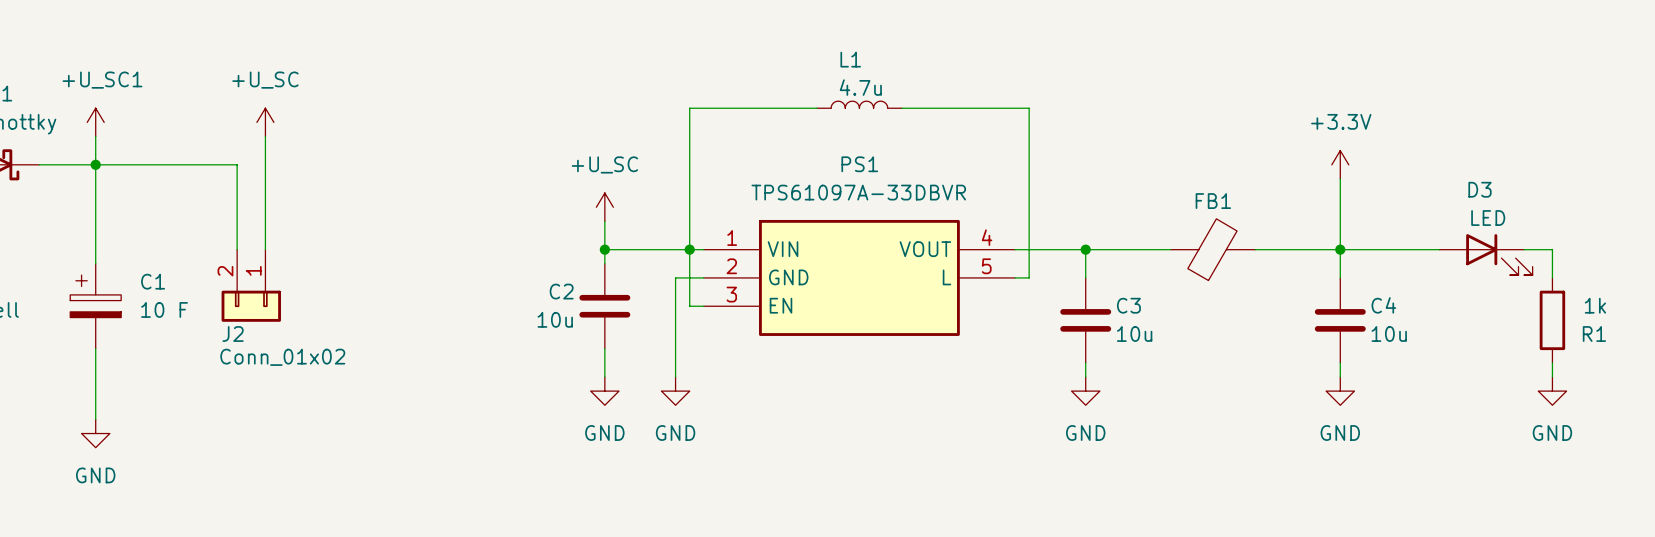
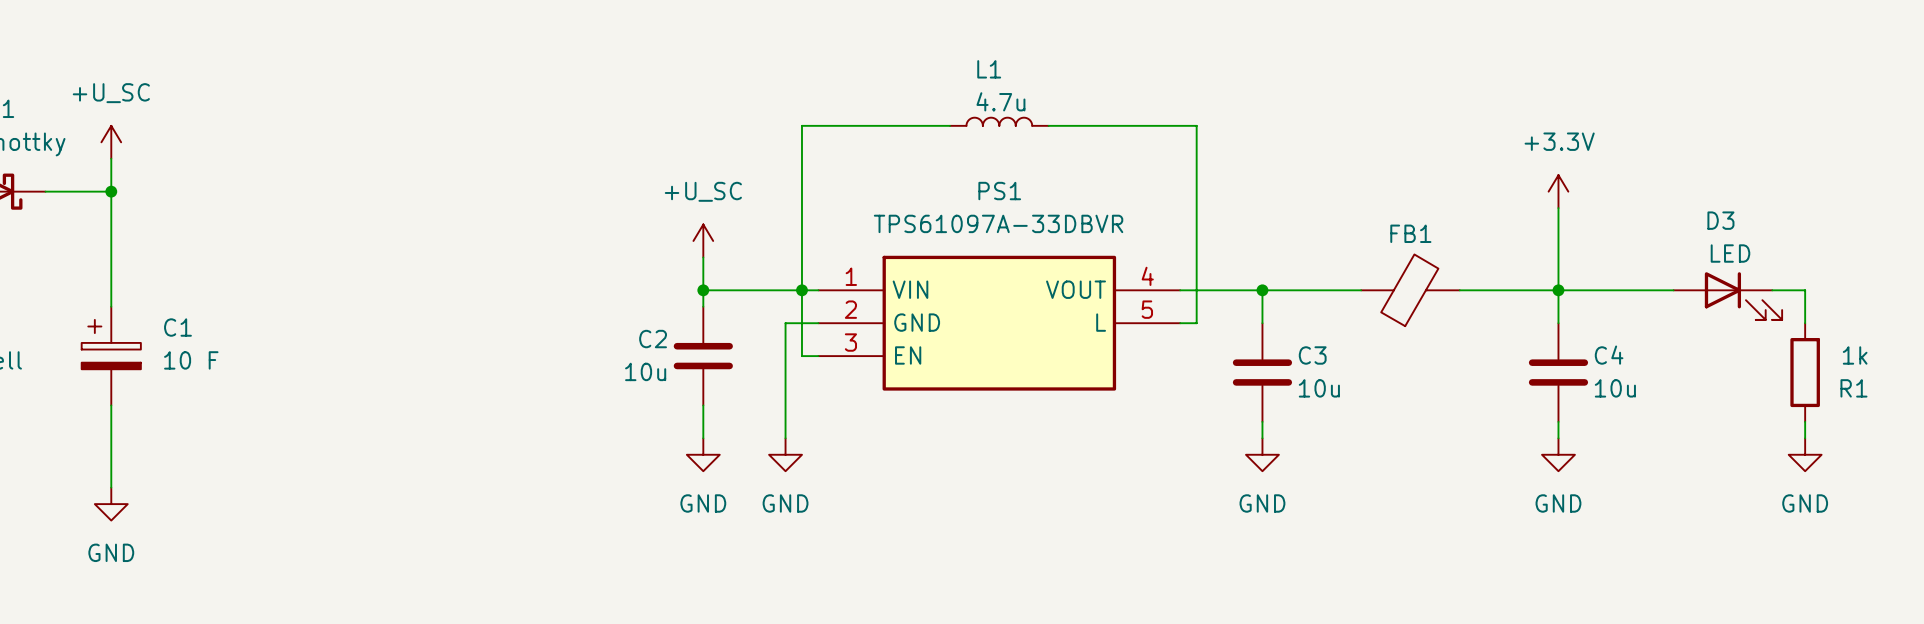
power symbol: +U_SC1 (95, 122) -> +U_SC (111, 142)
power symbol: +U_SC (265, 122) -> none
wire: (265, 136) (265, 249) -> none
wire: (95, 164) (237, 164) (237, 249) -> none
J2: Conn_01x02 (251, 285) -> none

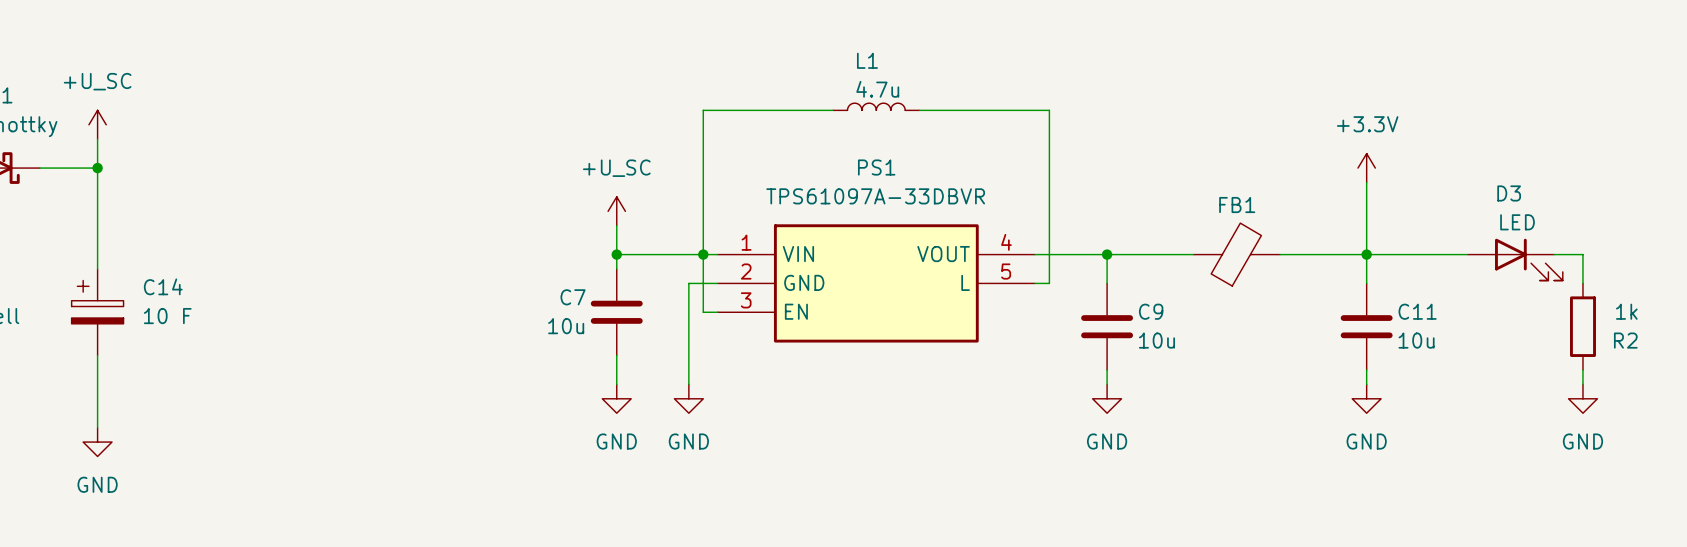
C1 name: C1 (177, 327) -> C14 (163, 286)
C2 name: C2 (653, 339) -> C7 (573, 297)
C3 name: C3 (1312, 355) -> C9 (1151, 311)
C4 name: C4 (1609, 355) -> C11 (1417, 311)
R1 name: R1 (1853, 388) -> R2 (1625, 340)

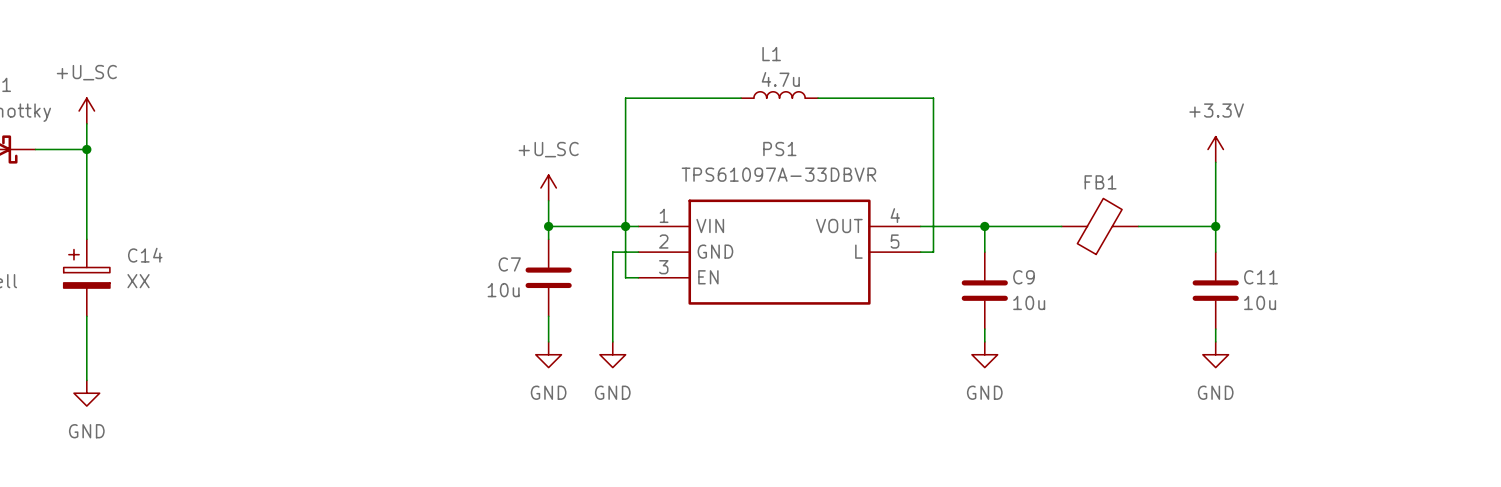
wire: (1366, 254) (1467, 254) -> none
wire: (1554, 254) (1582, 254) (1582, 283) -> none
D3: LED (1515, 259) -> none
C14 value: 10 F (167, 316) -> XX (138, 281)
R2: 1k (1582, 326) -> none
wire: (1582, 369) (1582, 384) -> none
power symbol: GND (1582, 398) -> none

